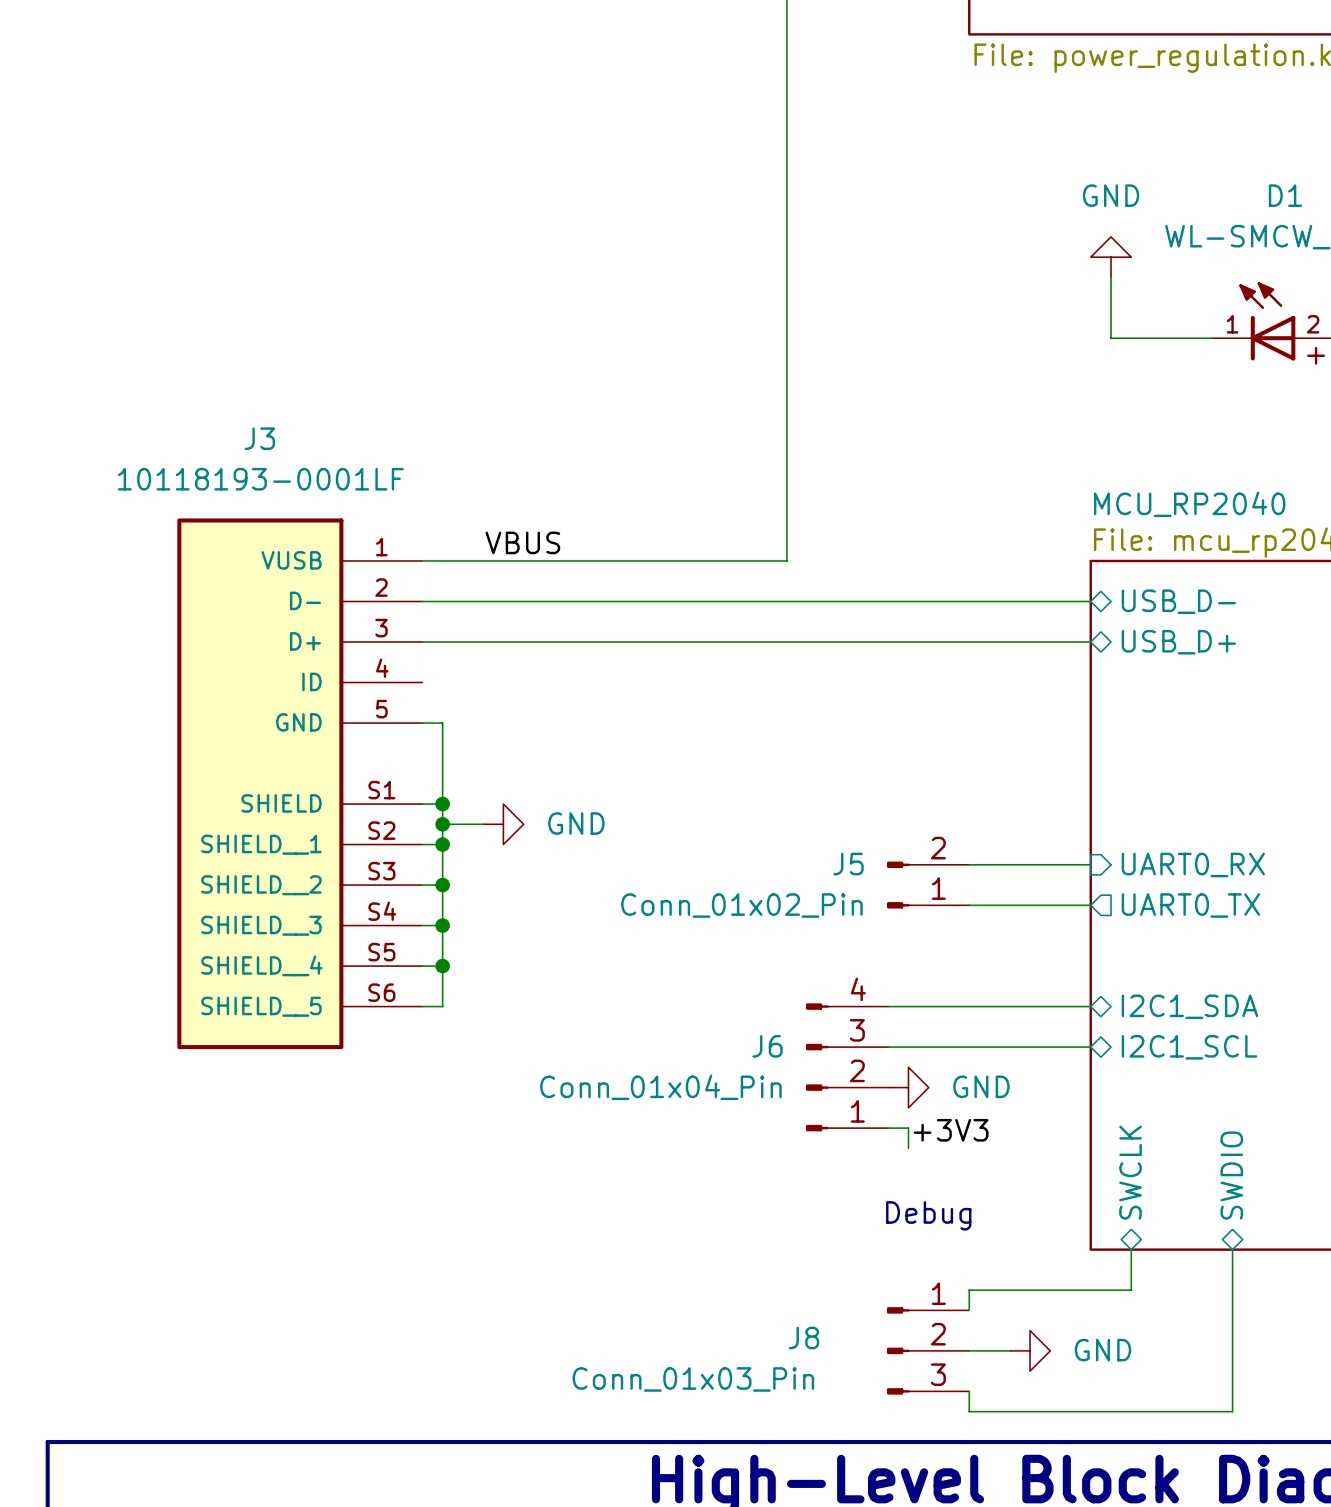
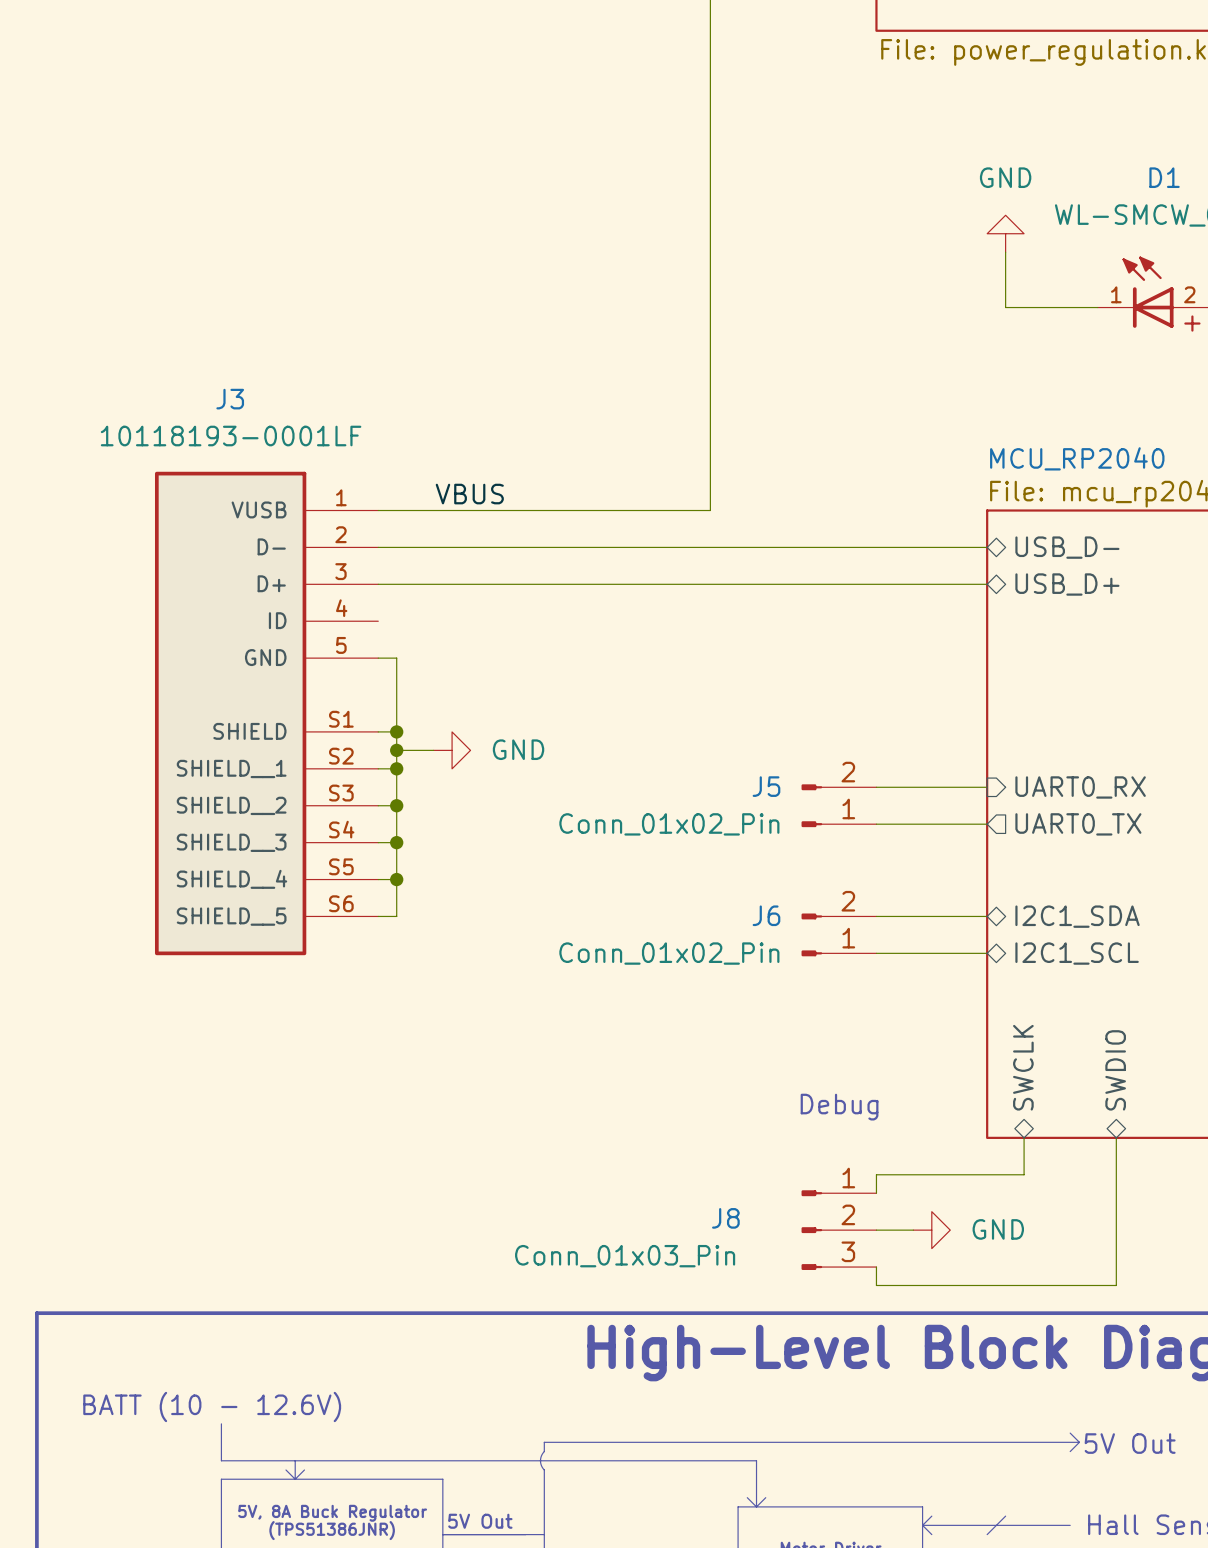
J6 symbol: [806, 1003, 889, 1132] -> [801, 913, 877, 957]
J6 value: Conn_01x04_Pin (660, 1087) -> Conn_01x02_Pin (669, 953)
power symbol: GND (908, 1087) -> none
wire: (888, 1128) (908, 1128) (908, 1148) -> none
label: +3V3 (951, 1130) -> none

